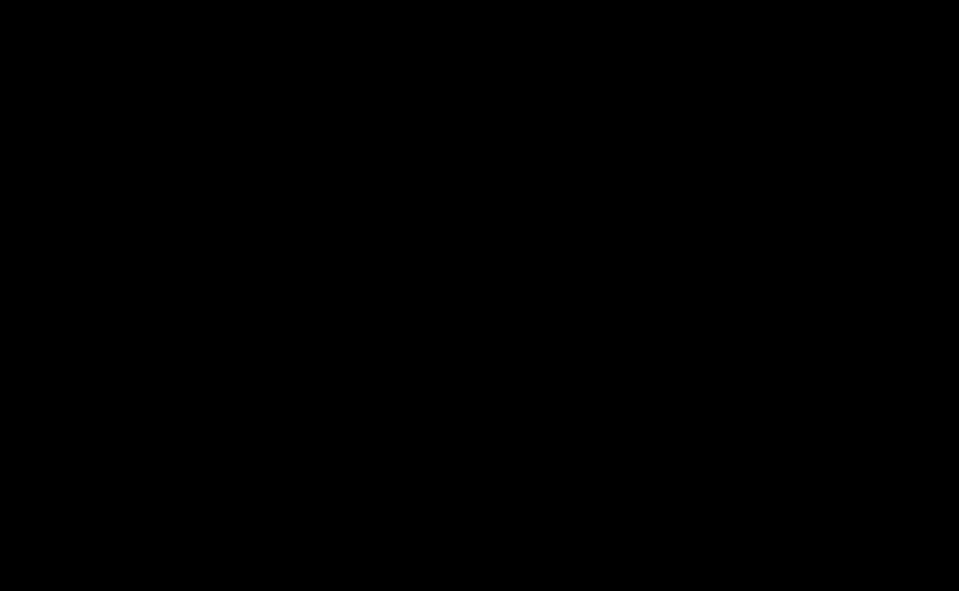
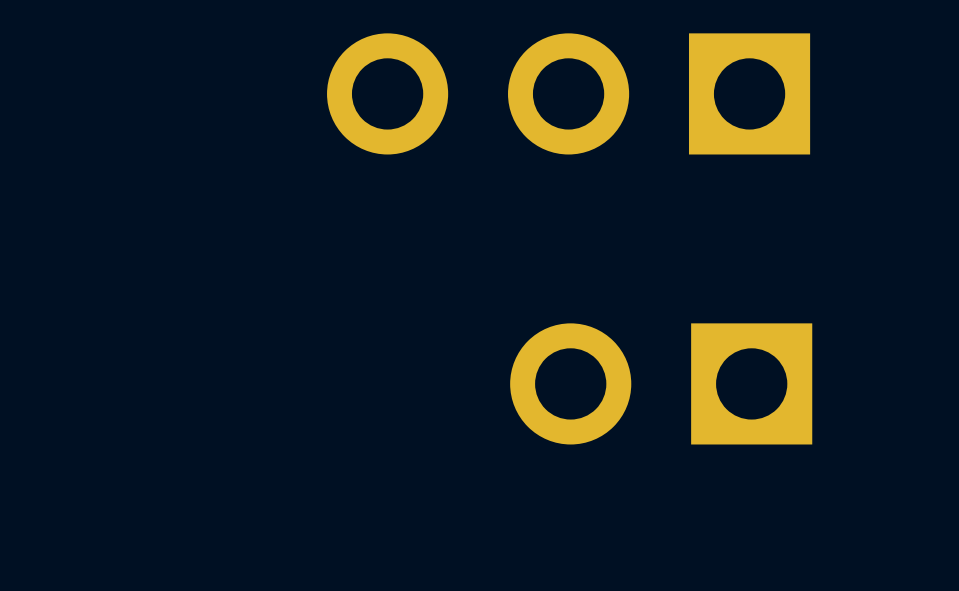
part: none -> (568, 93)
part: none -> (661, 383)

